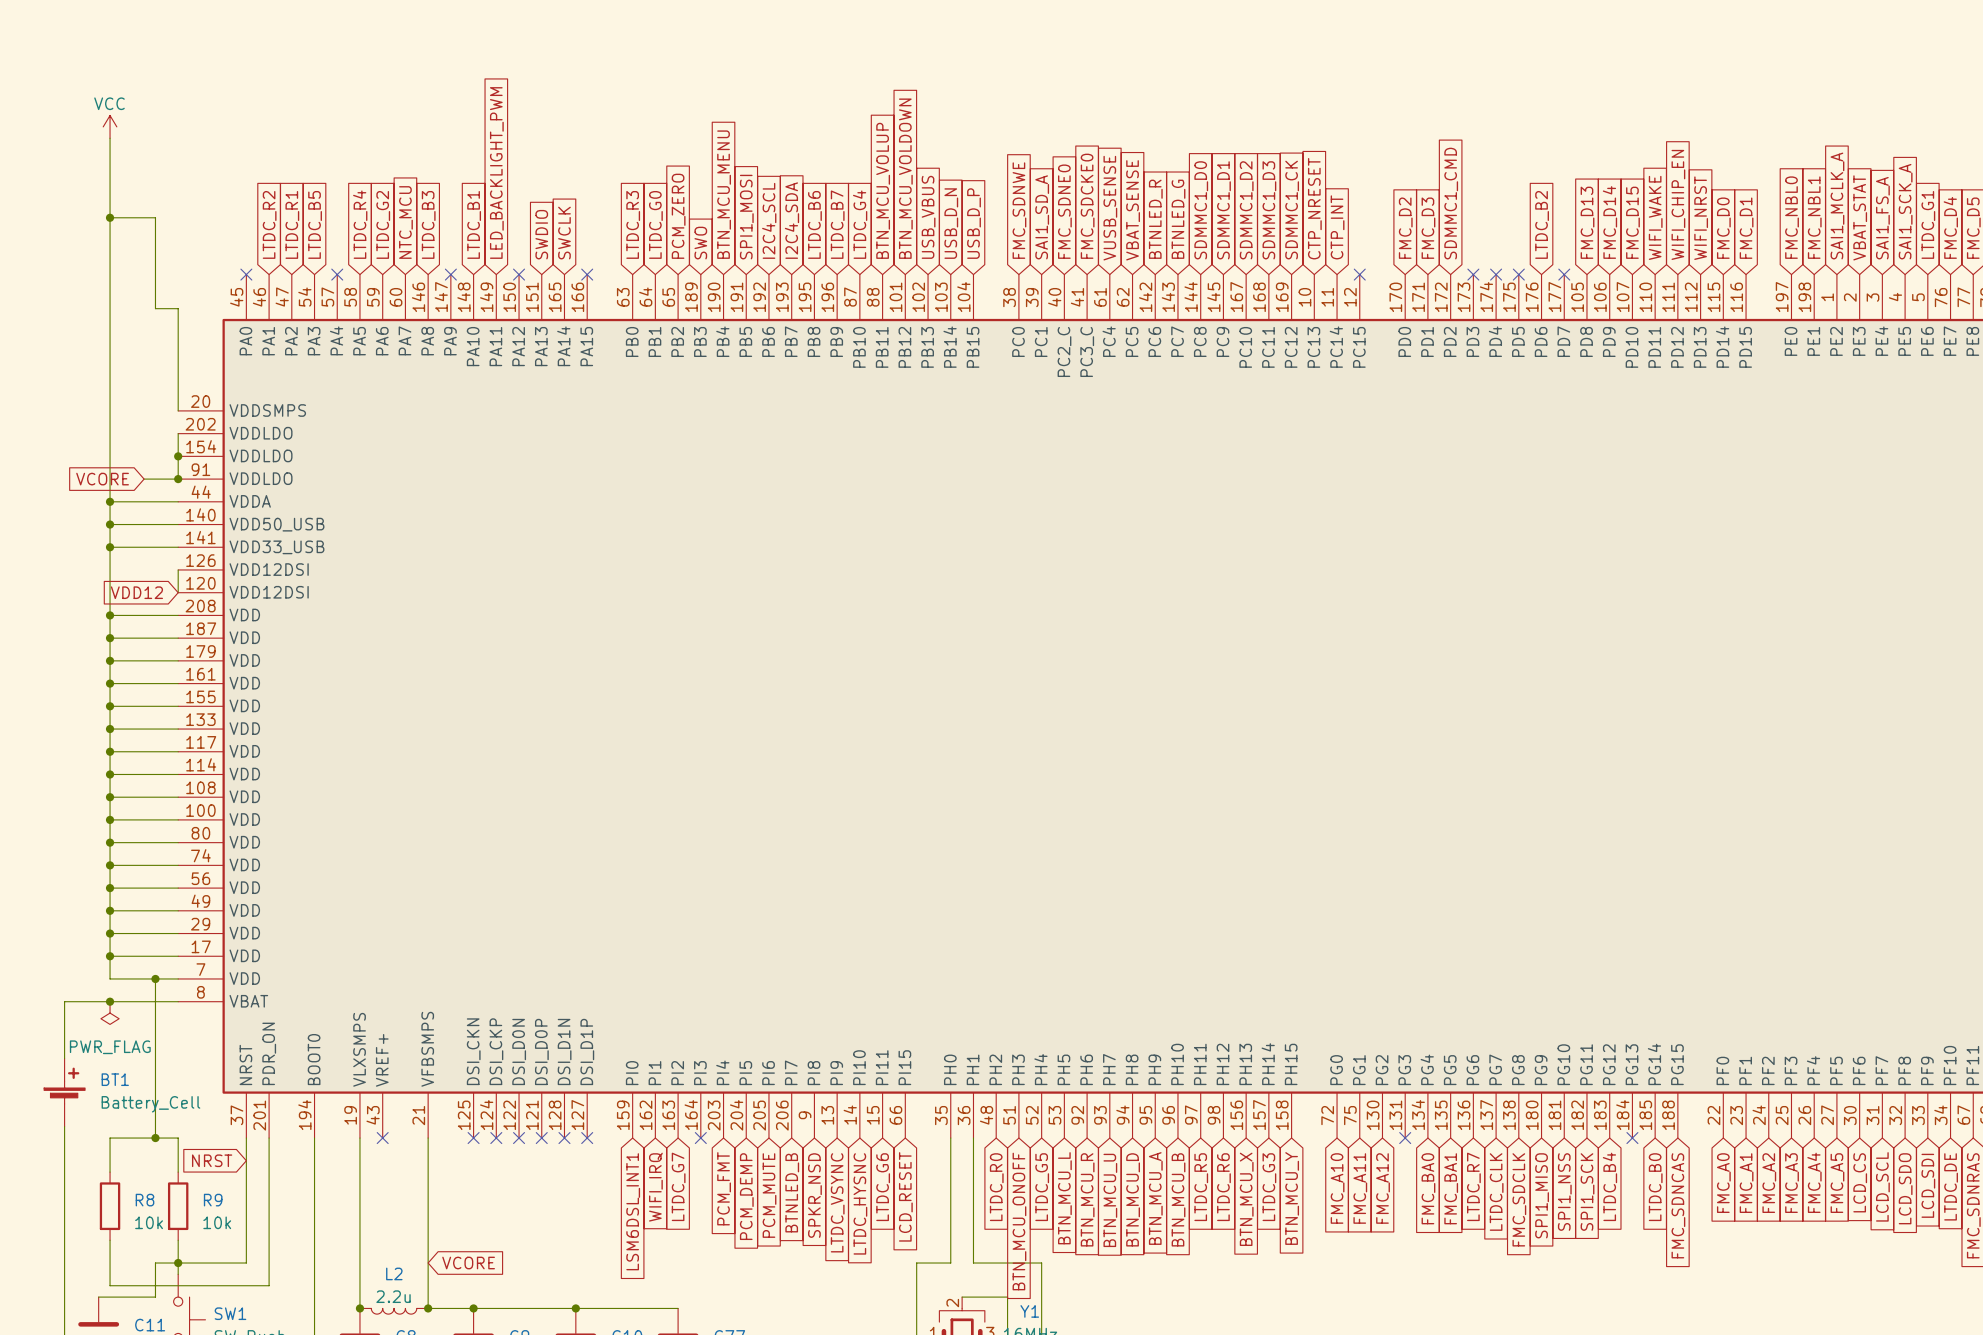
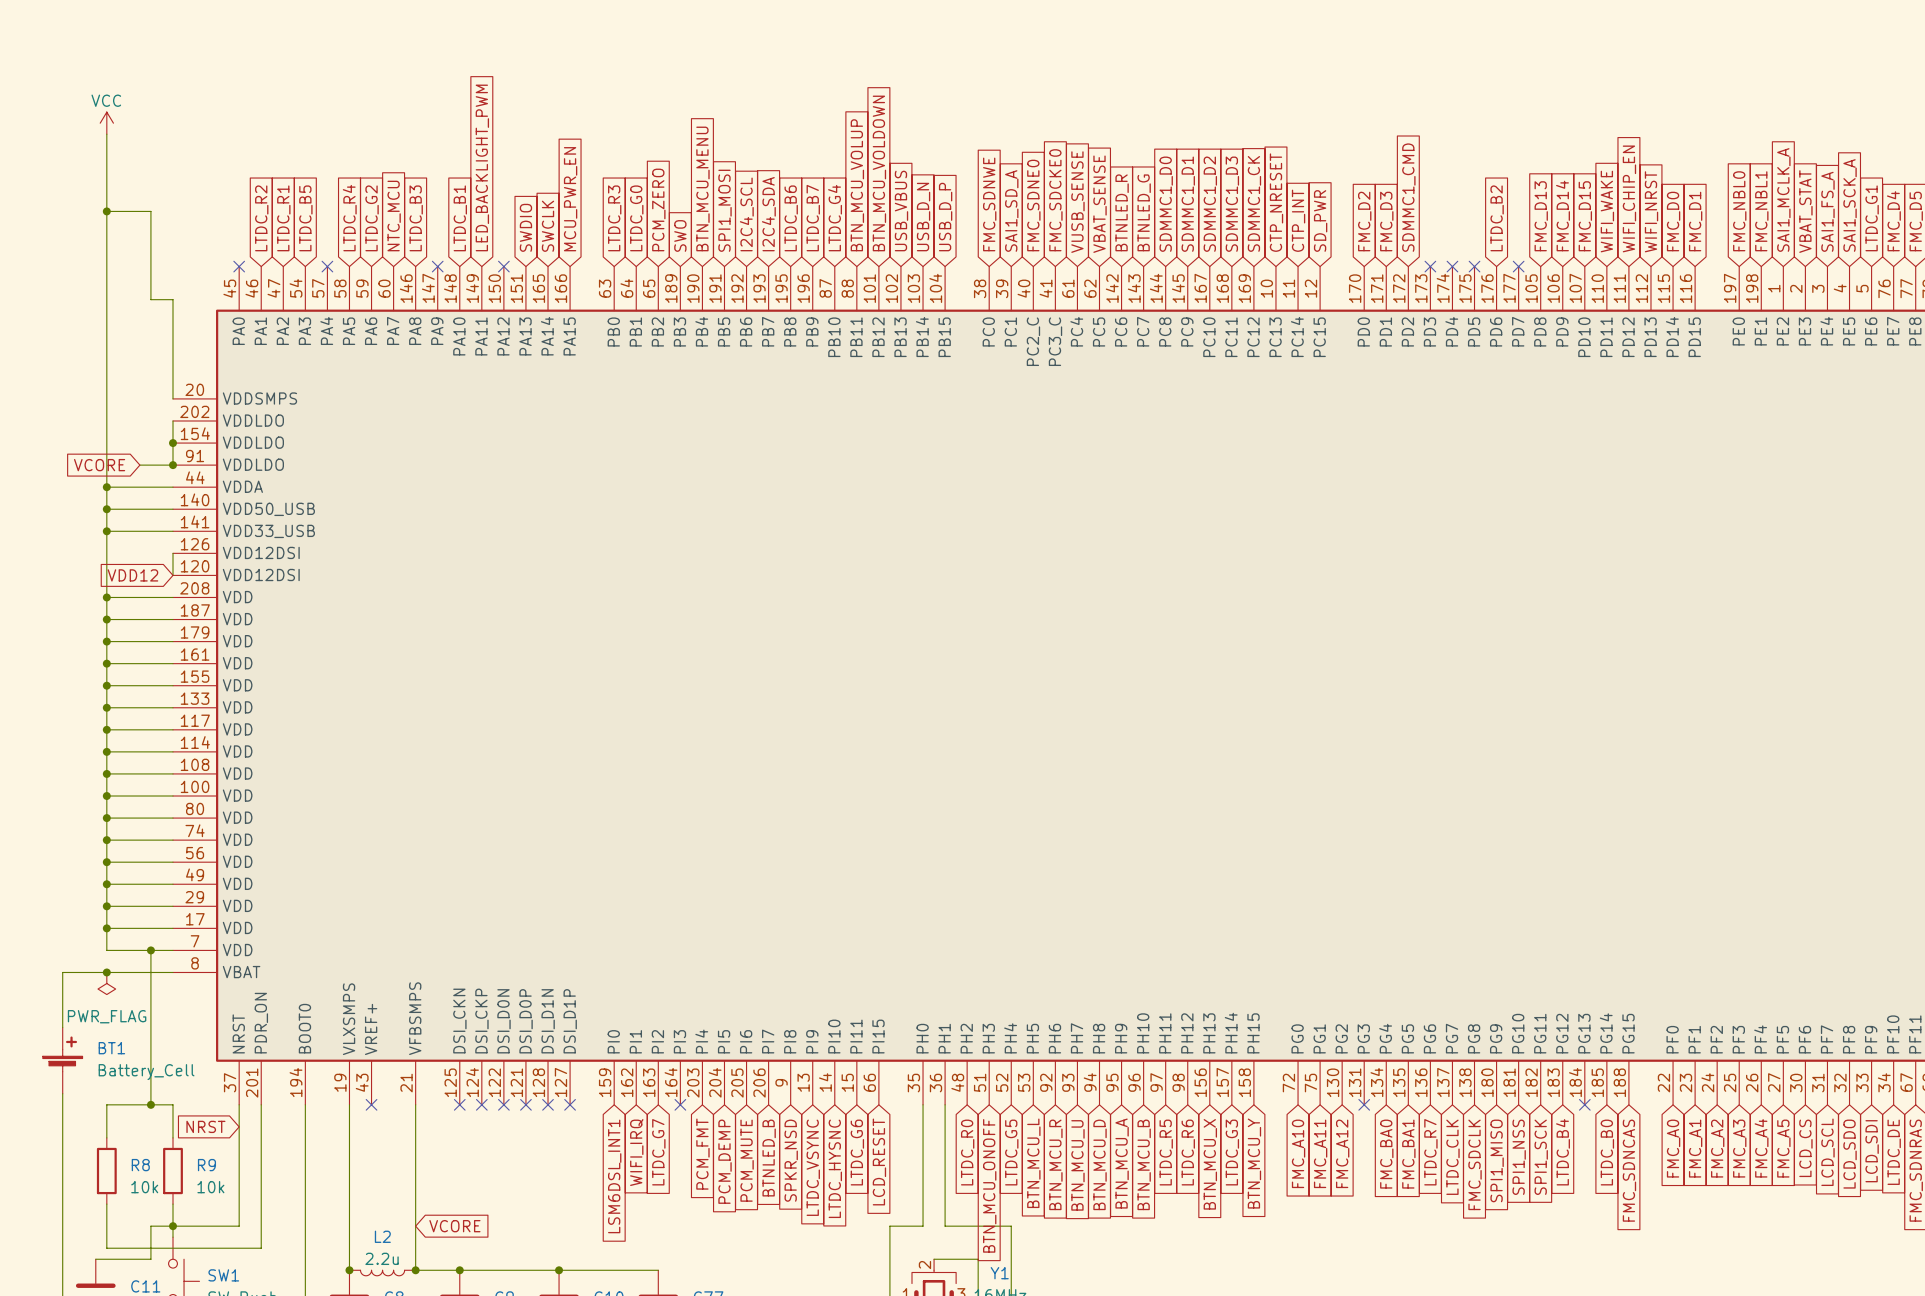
global label: none -> MCU_PWR_EN (570, 199)
global label: none -> SD_PWR (1320, 220)
no-connect mark: (587, 274) -> none
no-connect mark: (1359, 274) -> none

